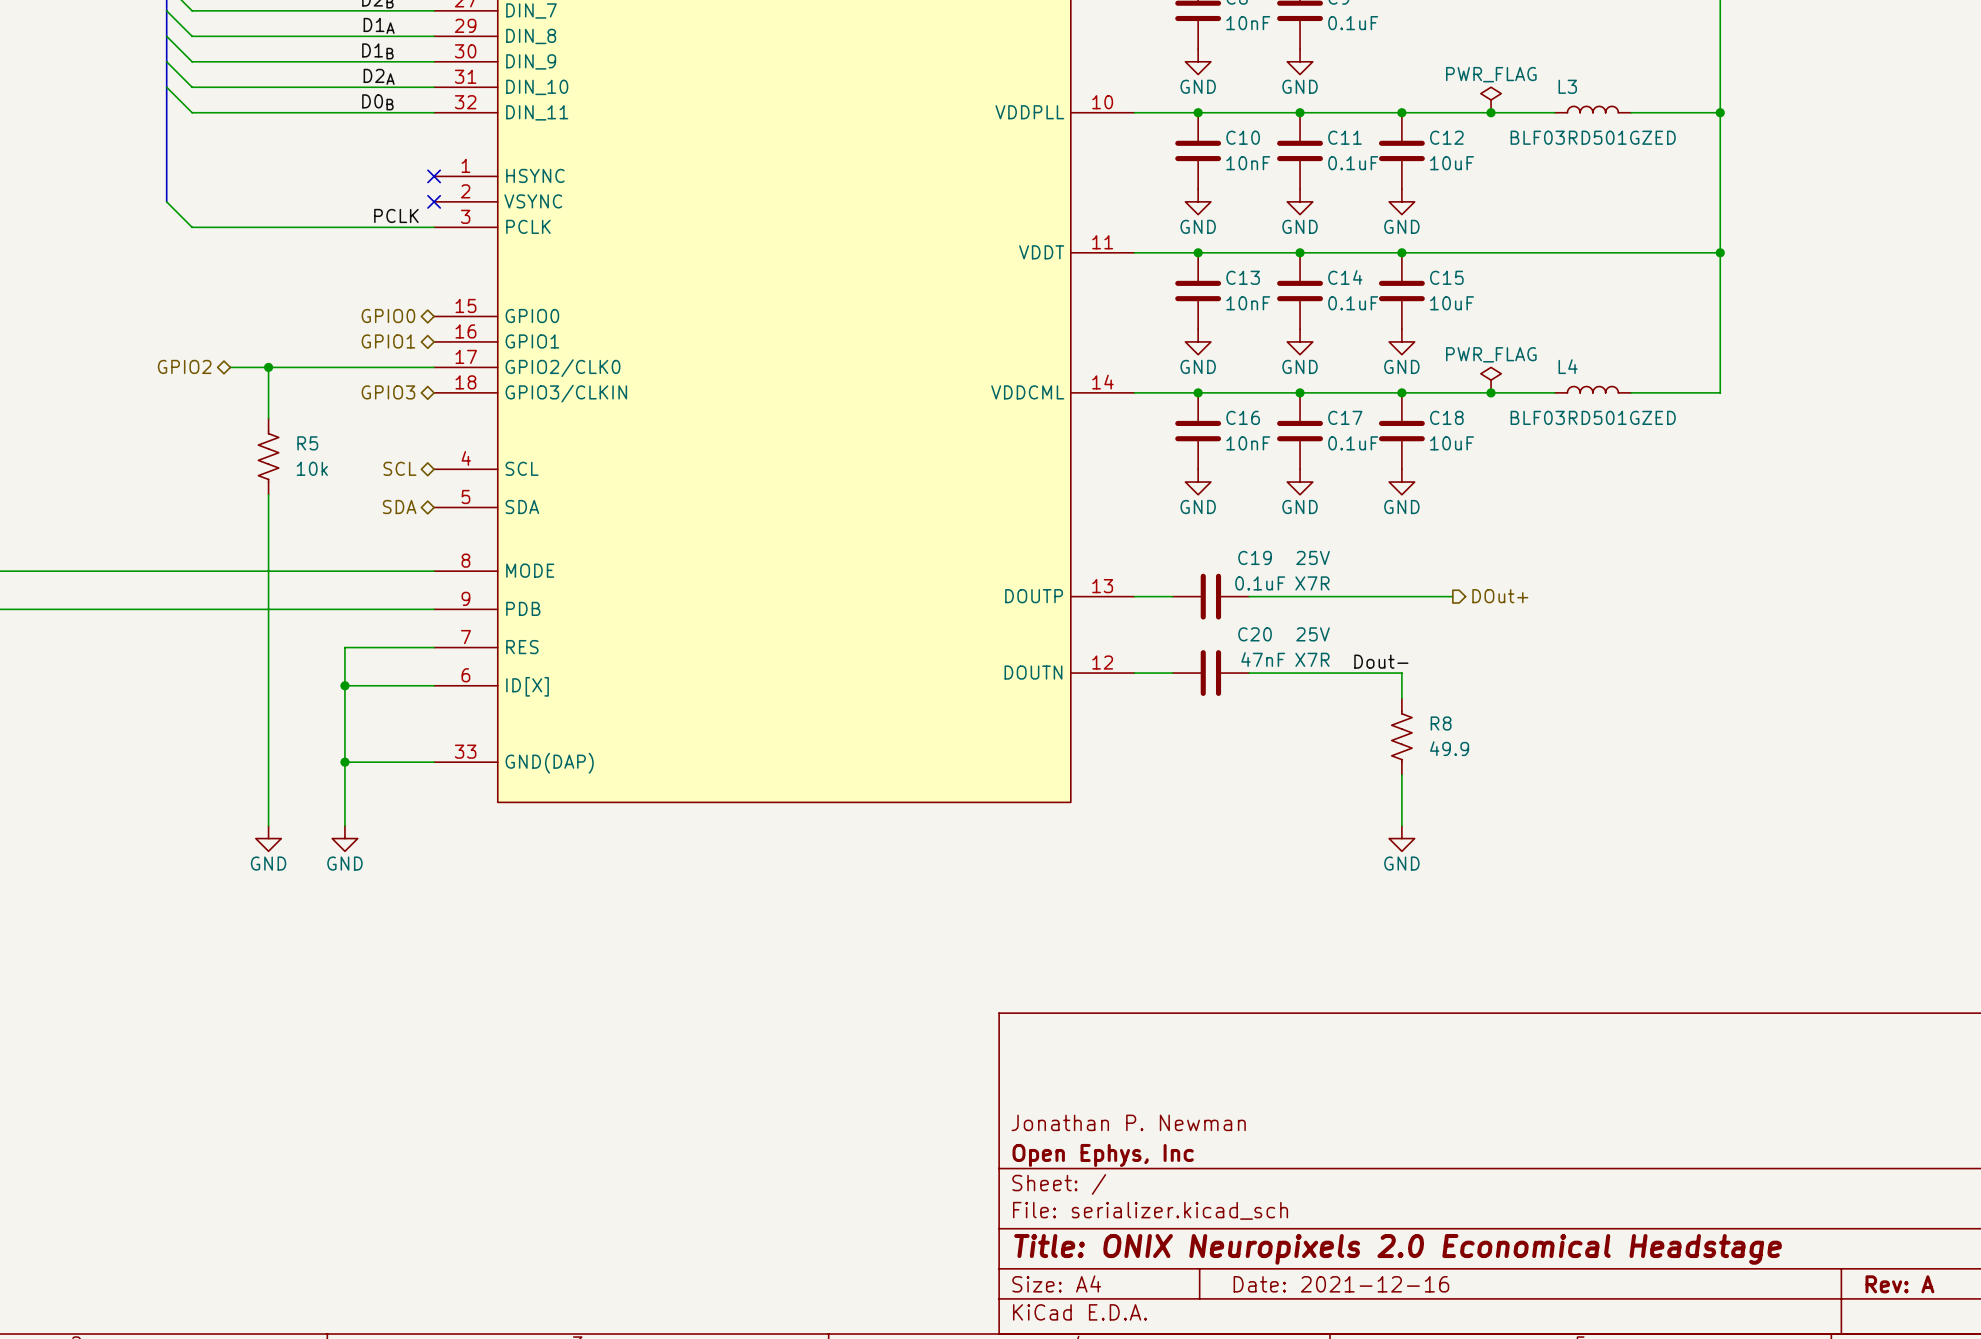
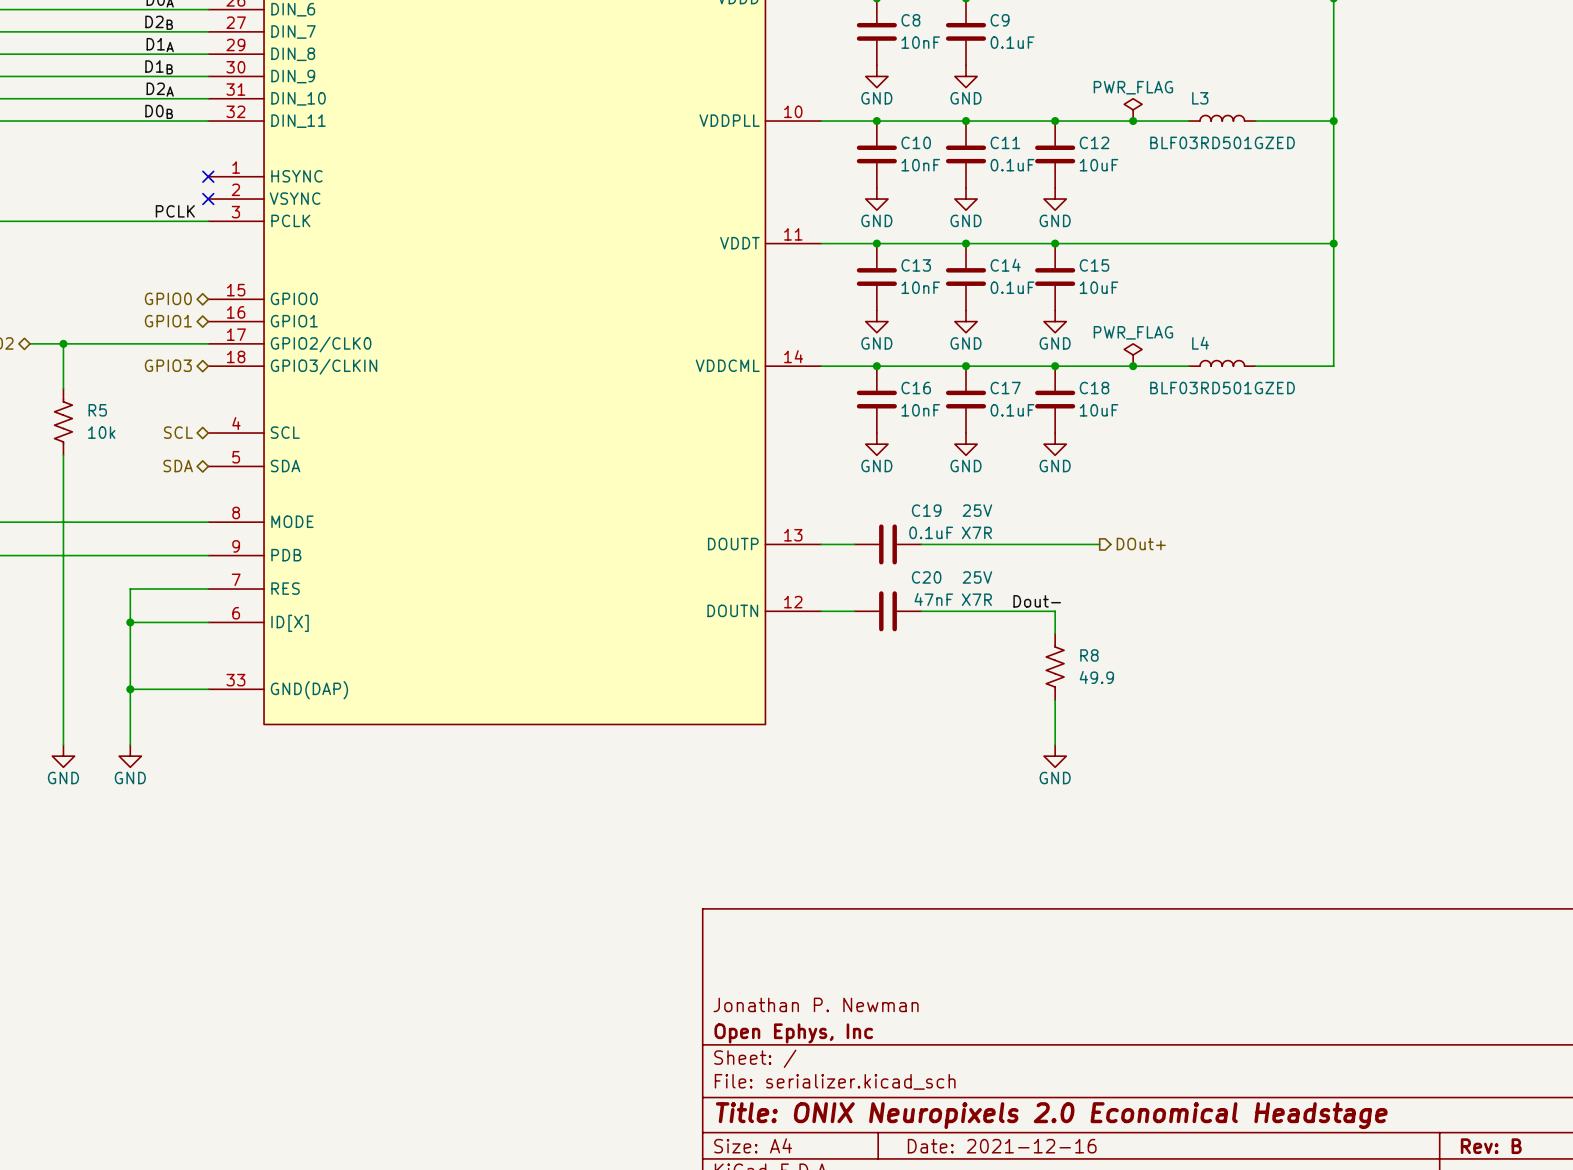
title block: Rev: A (1899, 1284) -> Rev: B (1491, 1146)

